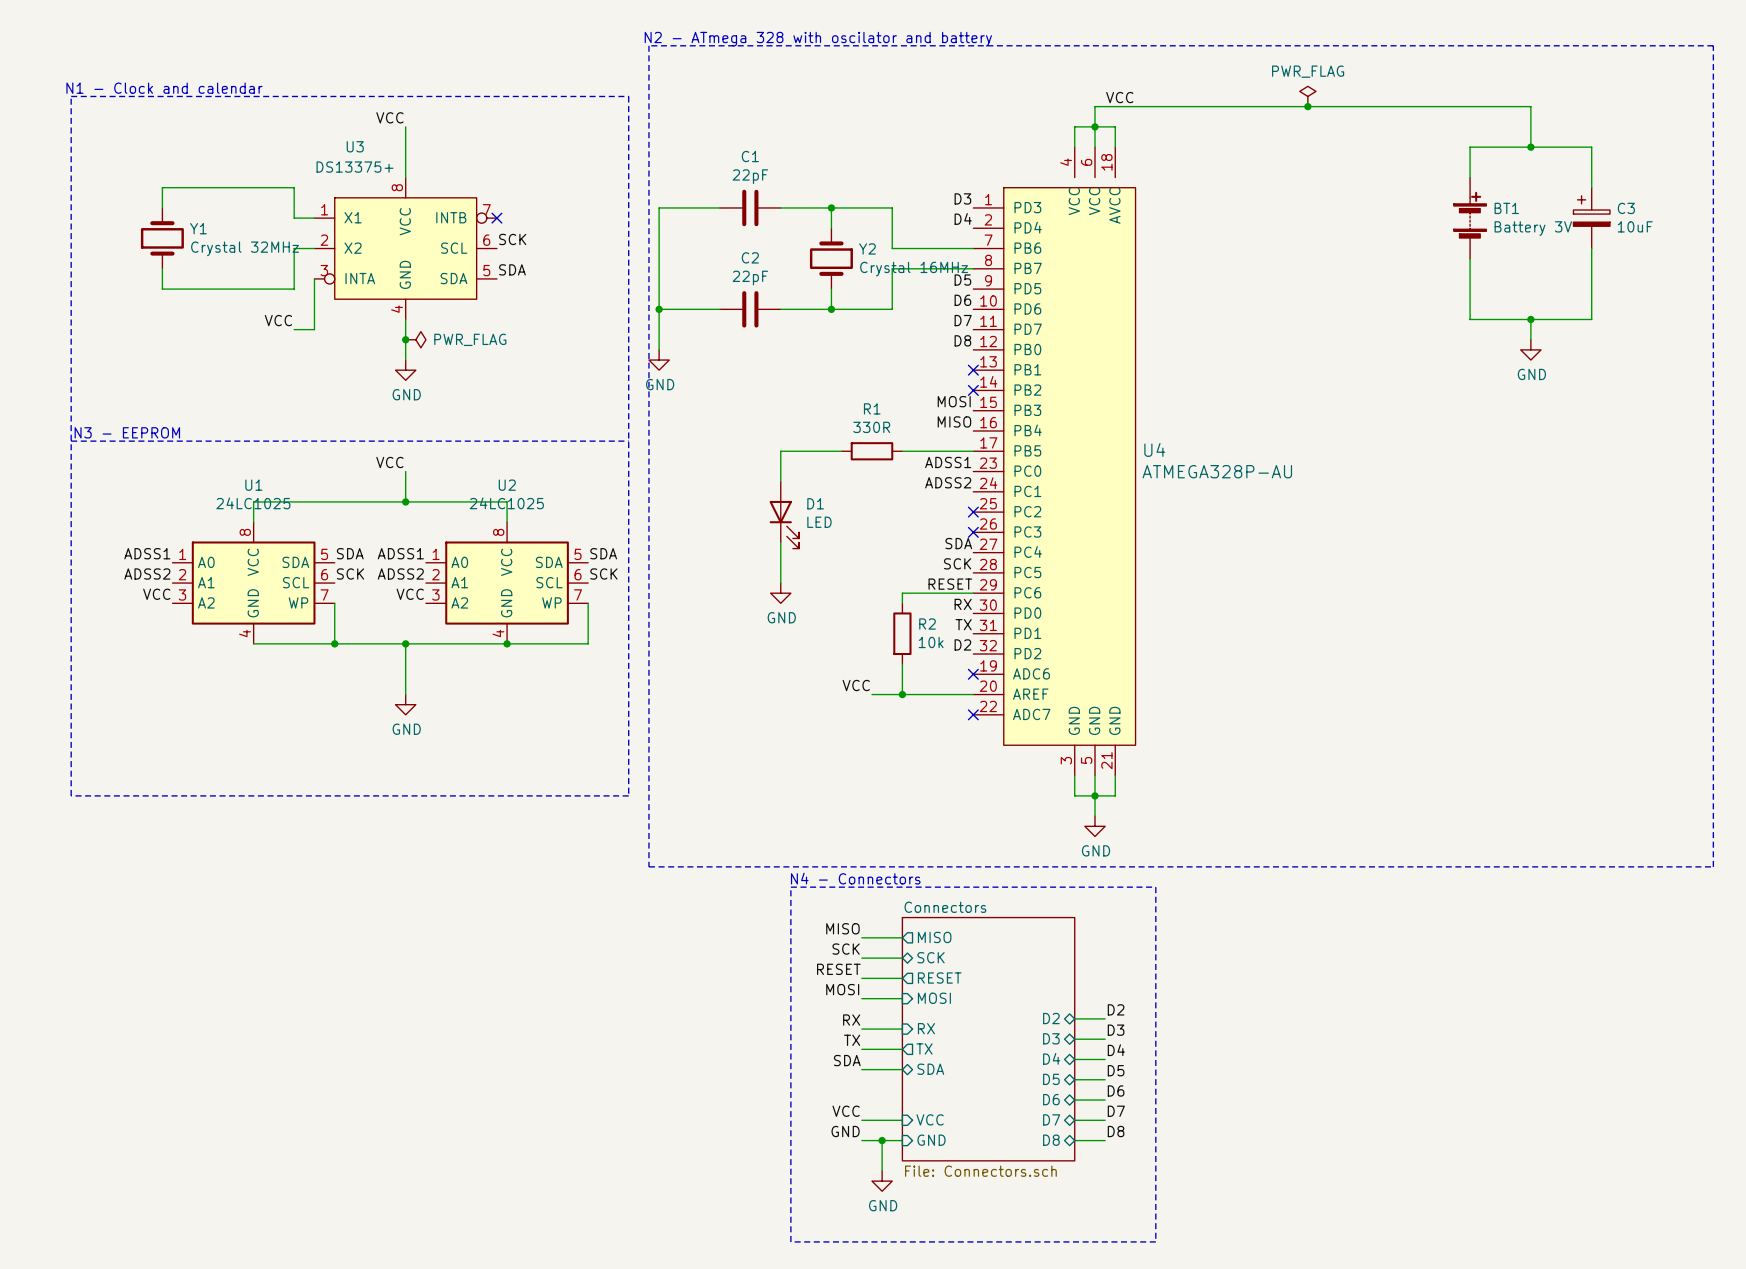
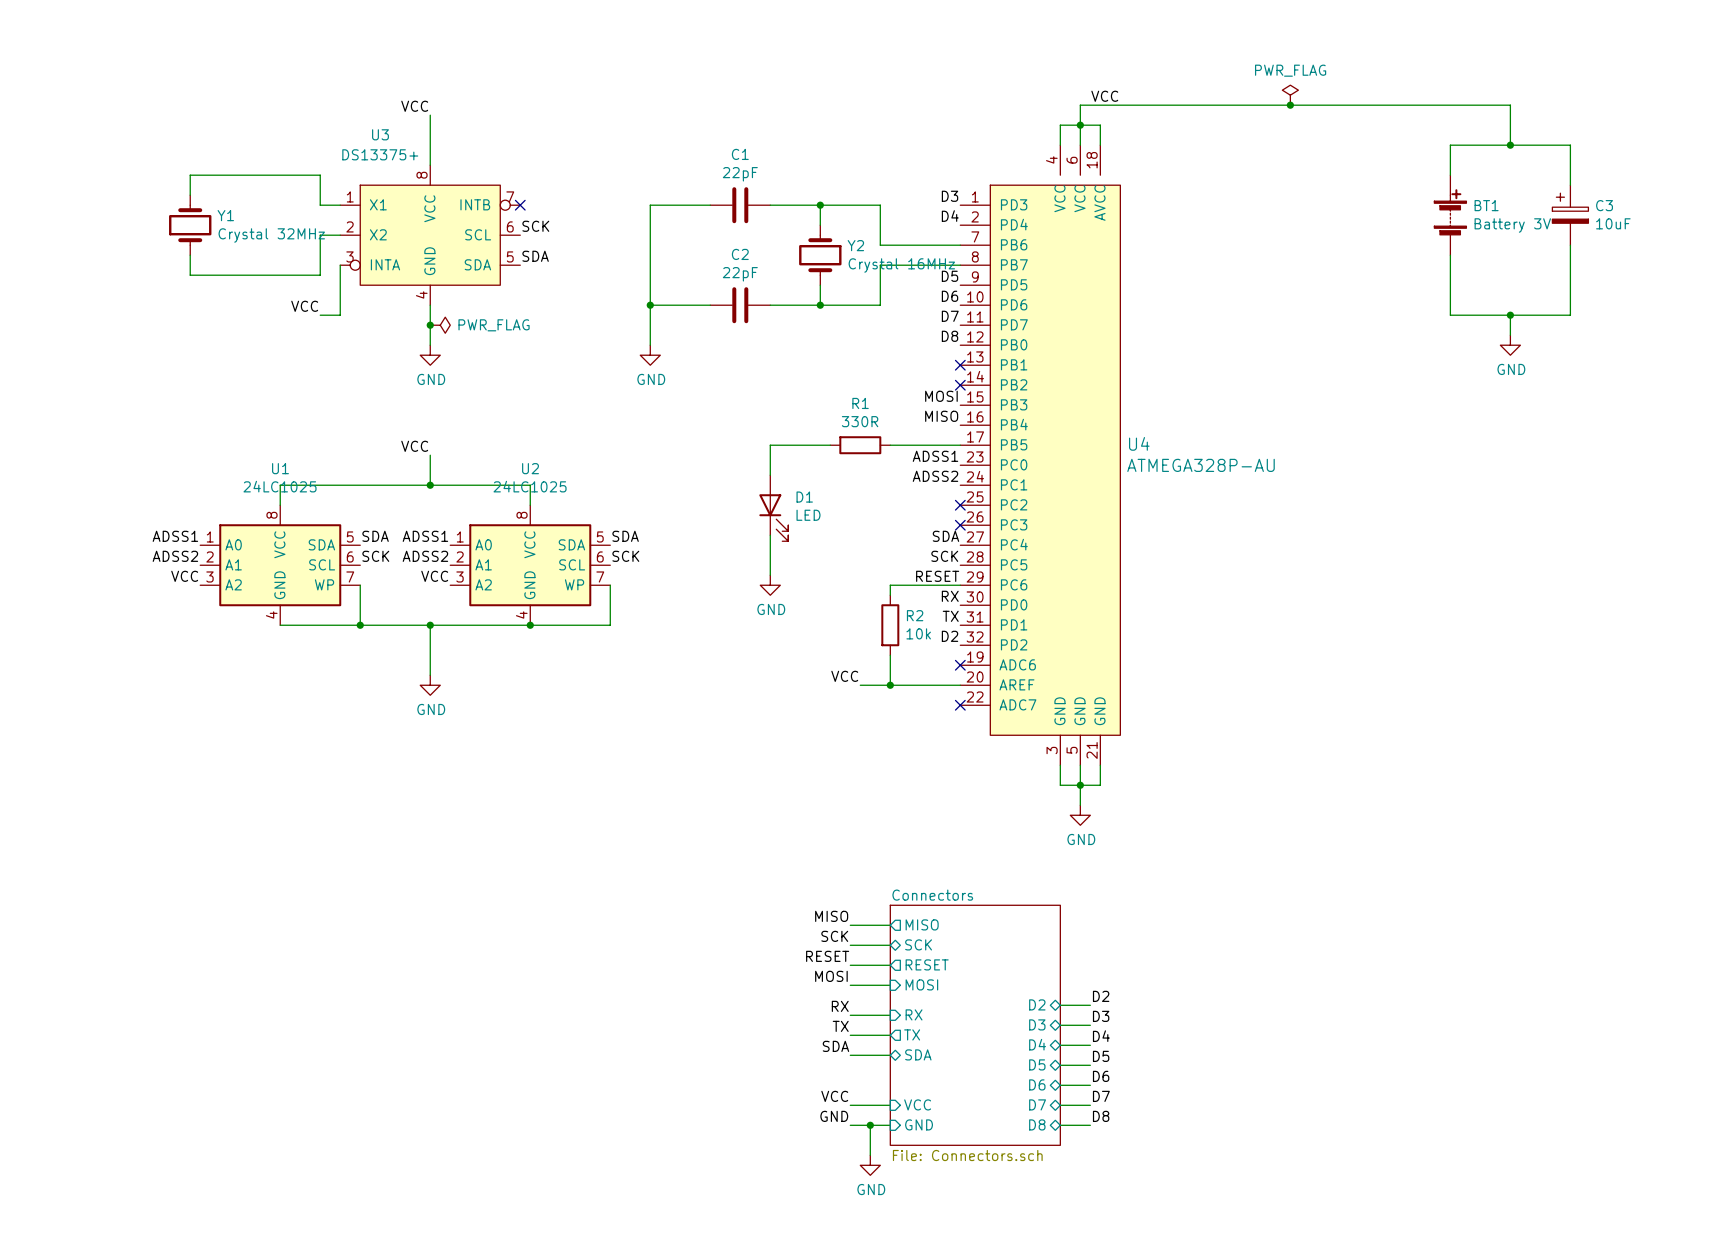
text: N2 - ATmega 328 with oscilator and battery (818, 39) -> none
line: (648, 45) (648, 866) (1713, 866) (1713, 45) (648, 45) -> none
text: N1 - Clock and calendar (164, 88) -> none
line: (71, 96) (628, 96) (628, 795) (71, 795) (71, 96) -> none
label position: VCC (389, 117) -> VCC (414, 106)
wire: (405, 126) (405, 177) -> (430, 115) (430, 165)
wire: (162, 207) (162, 187) (294, 187) (294, 218) (314, 218) -> (190, 195) (190, 175) (320, 175) (320, 205) (340, 205)
no-connect mark position: (496, 218) -> (520, 205)
Y1 position: (162, 238) -> (190, 225)
label position: SCK (512, 239) -> SCK (535, 226)
wire: (314, 248) (294, 248) (294, 289) (162, 289) (162, 268) -> (340, 235) (320, 235) (320, 275) (190, 275) (190, 255)
U3 position: (405, 248) -> (430, 235)
label position: SDA (512, 269) -> SDA (535, 256)
wire: (314, 278) (314, 329) (294, 329) -> (340, 265) (340, 315) (320, 315)
wire: (405, 319) (405, 360) -> (430, 305) (430, 345)
label position: VCC (278, 320) -> VCC (304, 306)
junction position: (405, 339) -> (430, 325)
power symbol position: PWR_FLAG (415, 339) -> PWR_FLAG (440, 325)
power symbol position: GND (405, 370) -> GND (430, 355)
text: N3 - EEPROM (127, 432) -> none
line: (71, 441) (628, 441) -> none
label position: VCC (389, 462) -> VCC (414, 446)
wire: (405, 471) (405, 501) -> (430, 455) (430, 485)
junction position: (405, 501) -> (430, 485)
wire: (253, 522) (253, 501) (507, 501) (507, 522) -> (280, 505) (280, 485) (530, 485) (530, 505)
label position: ADSS1 (147, 553) -> ADSS1 (175, 536)
label position: SDA (350, 553) -> SDA (375, 536)
label position: ADSS1 (400, 553) -> ADSS1 (425, 536)
label position: SDA (603, 553) -> SDA (625, 536)
label position: ADSS2 (147, 574) -> ADSS2 (175, 556)
label position: SCK (350, 574) -> SCK (375, 556)
label position: ADSS2 (400, 574) -> ADSS2 (425, 556)
label position: SCK (603, 574) -> SCK (625, 556)
U1 position: (253, 583) -> (280, 565)
U2 position: (507, 583) -> (530, 565)
label position: VCC (156, 594) -> VCC (184, 576)
label position: VCC (410, 594) -> VCC (434, 576)
wire: (334, 603) (334, 643) -> (360, 585) (360, 625)
wire: (588, 603) (588, 643) (253, 643) -> (610, 585) (610, 625) (280, 625)
junction: none -> (360, 625)
junction: none -> (430, 625)
junction: (334, 643) -> none
wire: (405, 643) (405, 694) -> (430, 625) (430, 675)
junction: (405, 643) -> none
junction position: (507, 643) -> (530, 625)
power symbol position: GND (405, 704) -> GND (430, 685)
text: N4 - Connectors (855, 878) -> none
line: (790, 887) (1155, 887) (1155, 1241) (790, 1241) (790, 887) -> none

